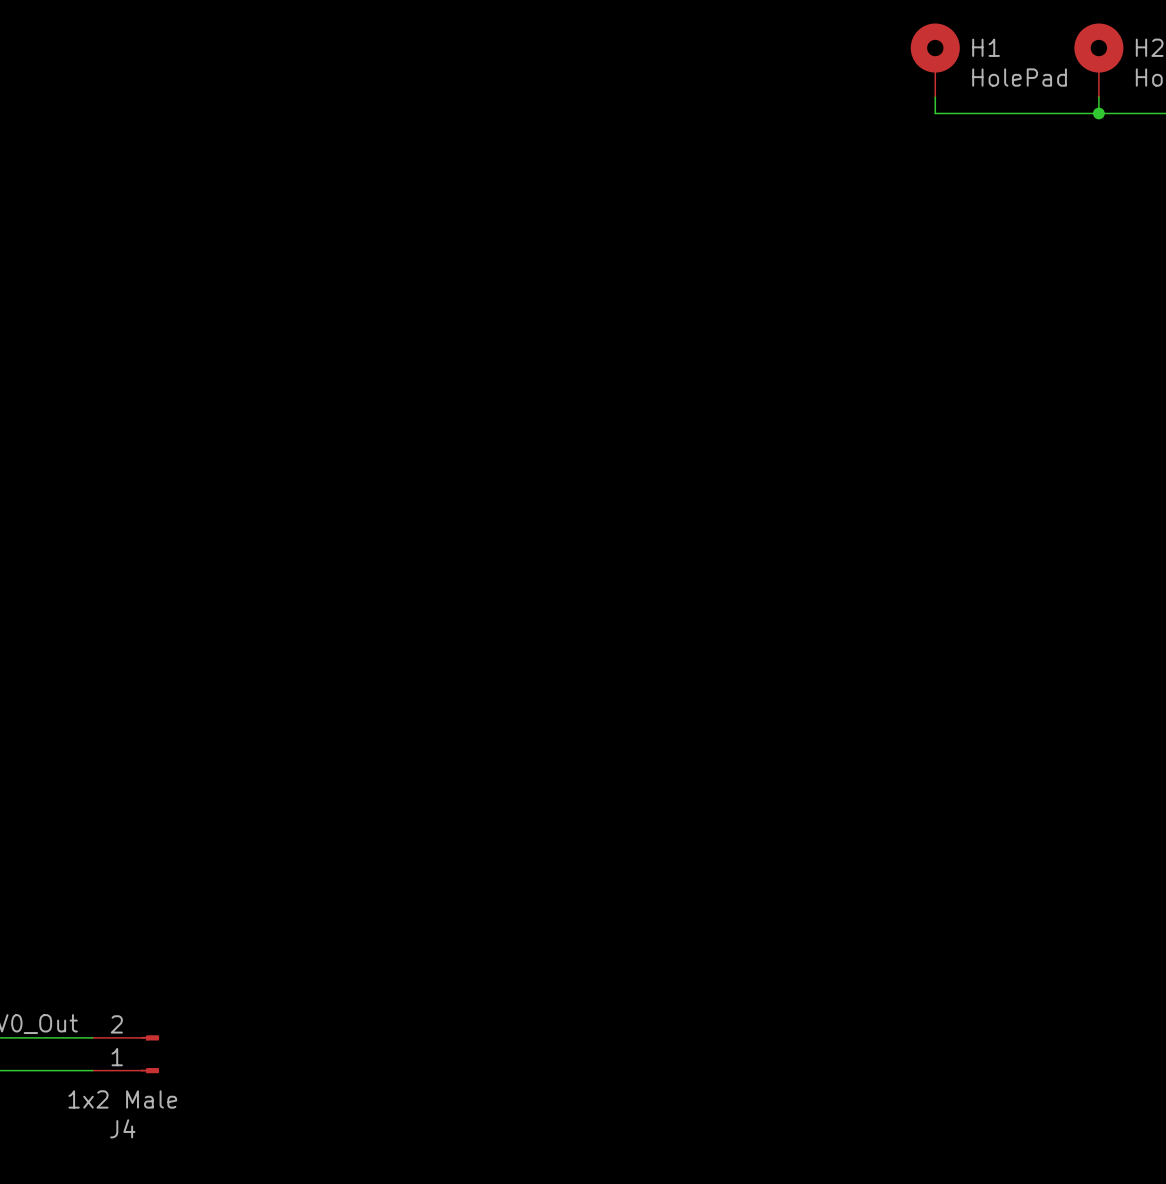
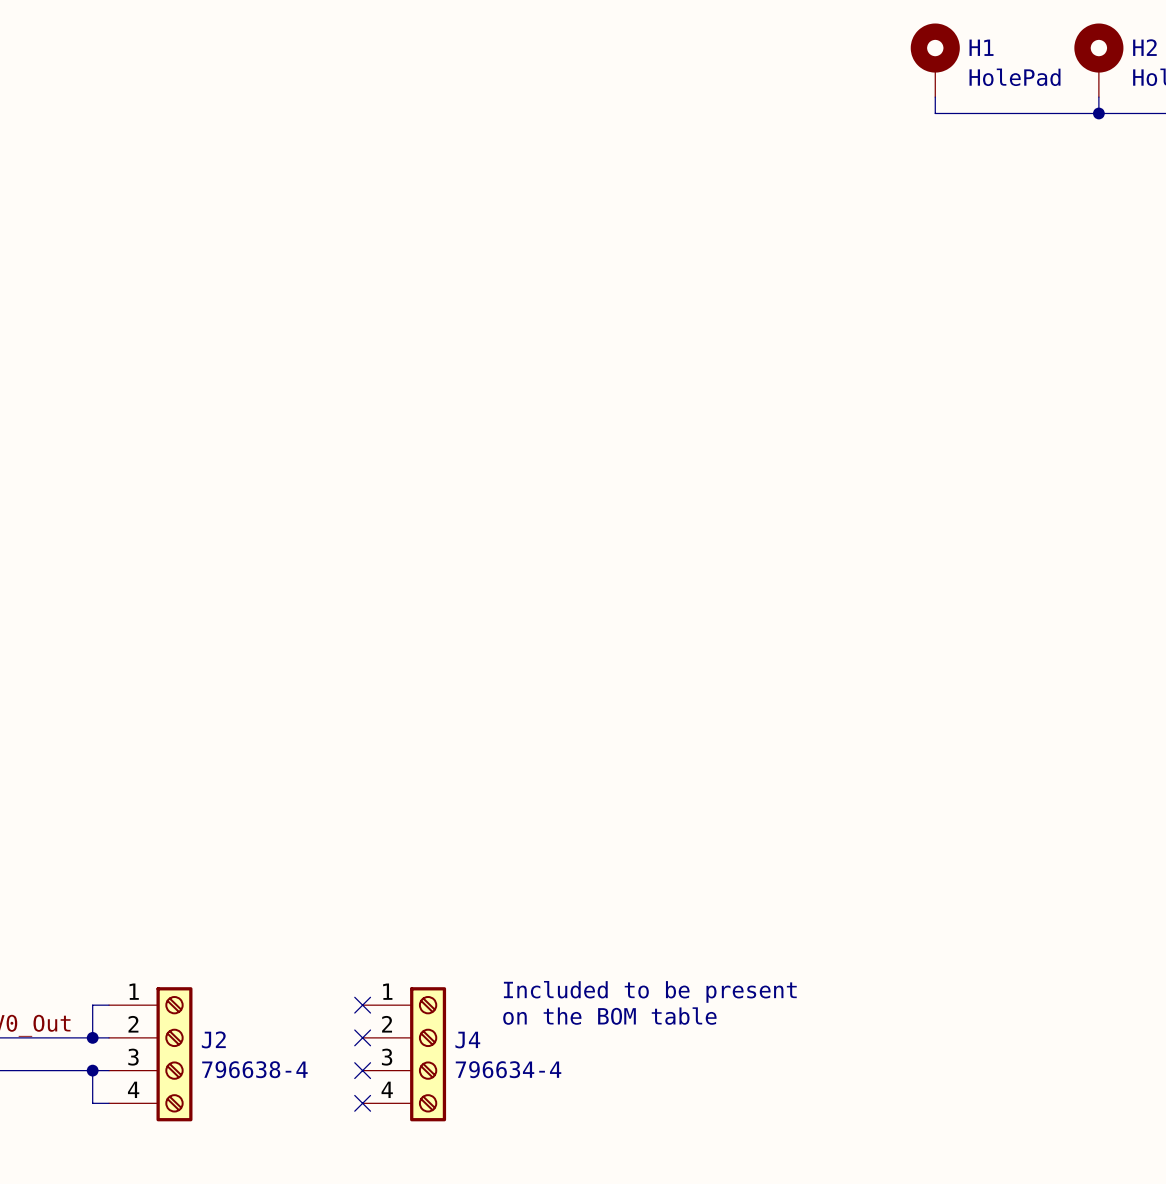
text: none -> Included to be present (650, 991)
wire: none -> (109, 1005) (92, 1005) (92, 1037) (109, 1037)
no-connect mark: none -> (362, 1005)
text: none -> on the BOM table (609, 1016)
J4 symbol: [92, 1035, 160, 1074] -> [362, 987, 447, 1122]
junction: none -> (92, 1037)
no-connect mark: none -> (362, 1037)
J2: none -> 796638-4 (150, 1054)
junction: none -> (92, 1070)
wire: none -> (109, 1070) (92, 1070) (92, 1103) (109, 1103)
no-connect mark: none -> (362, 1070)
J4 value: 1x2 Male (122, 1099) -> 796634-4 (508, 1069)
no-connect mark: none -> (362, 1103)
J4 name position: J4 (122, 1128) -> J4 (467, 1040)

